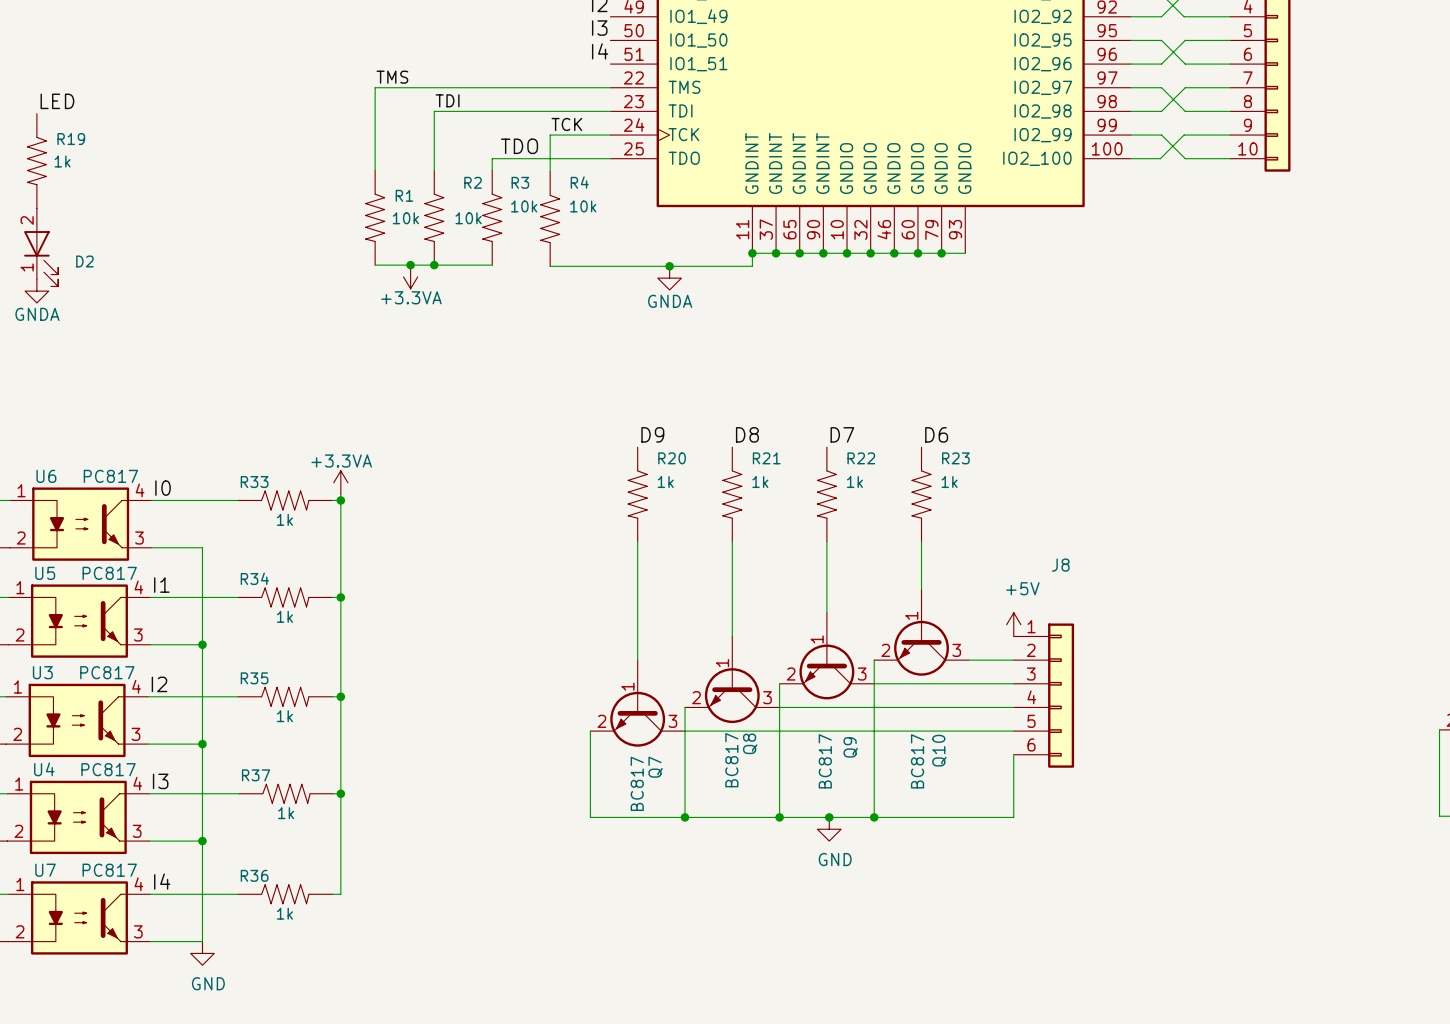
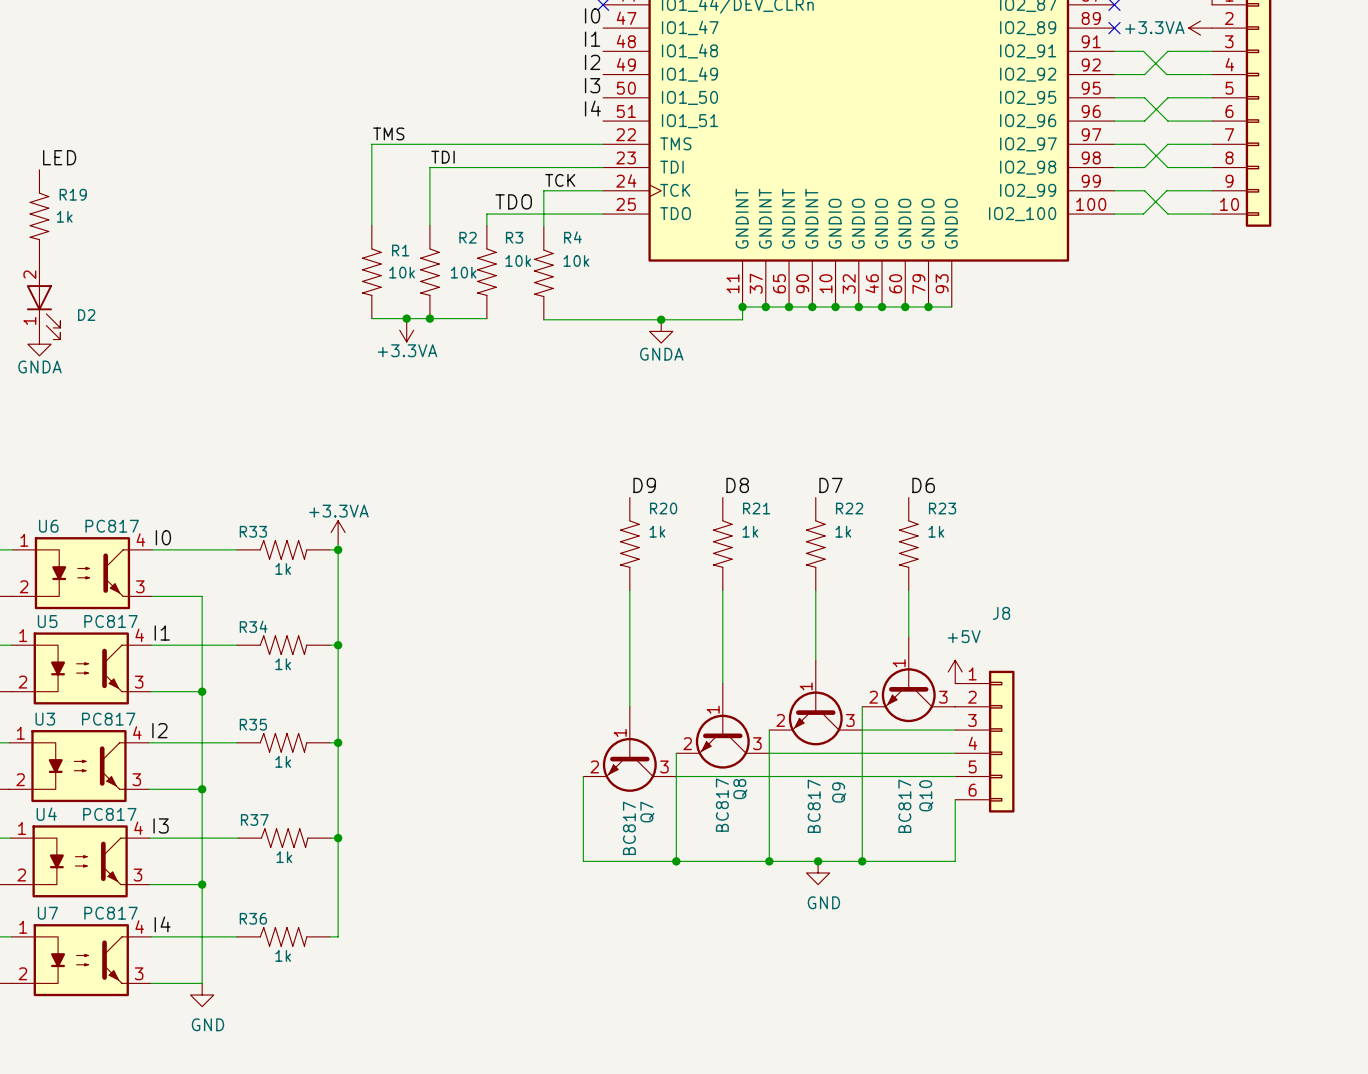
power symbol position: +5V (1013, 624) -> +5V (955, 671)
J8 position: (1043, 695) -> (984, 741)
wire: (1013, 754) (1013, 817) (968, 817) -> (955, 799) (955, 861)

